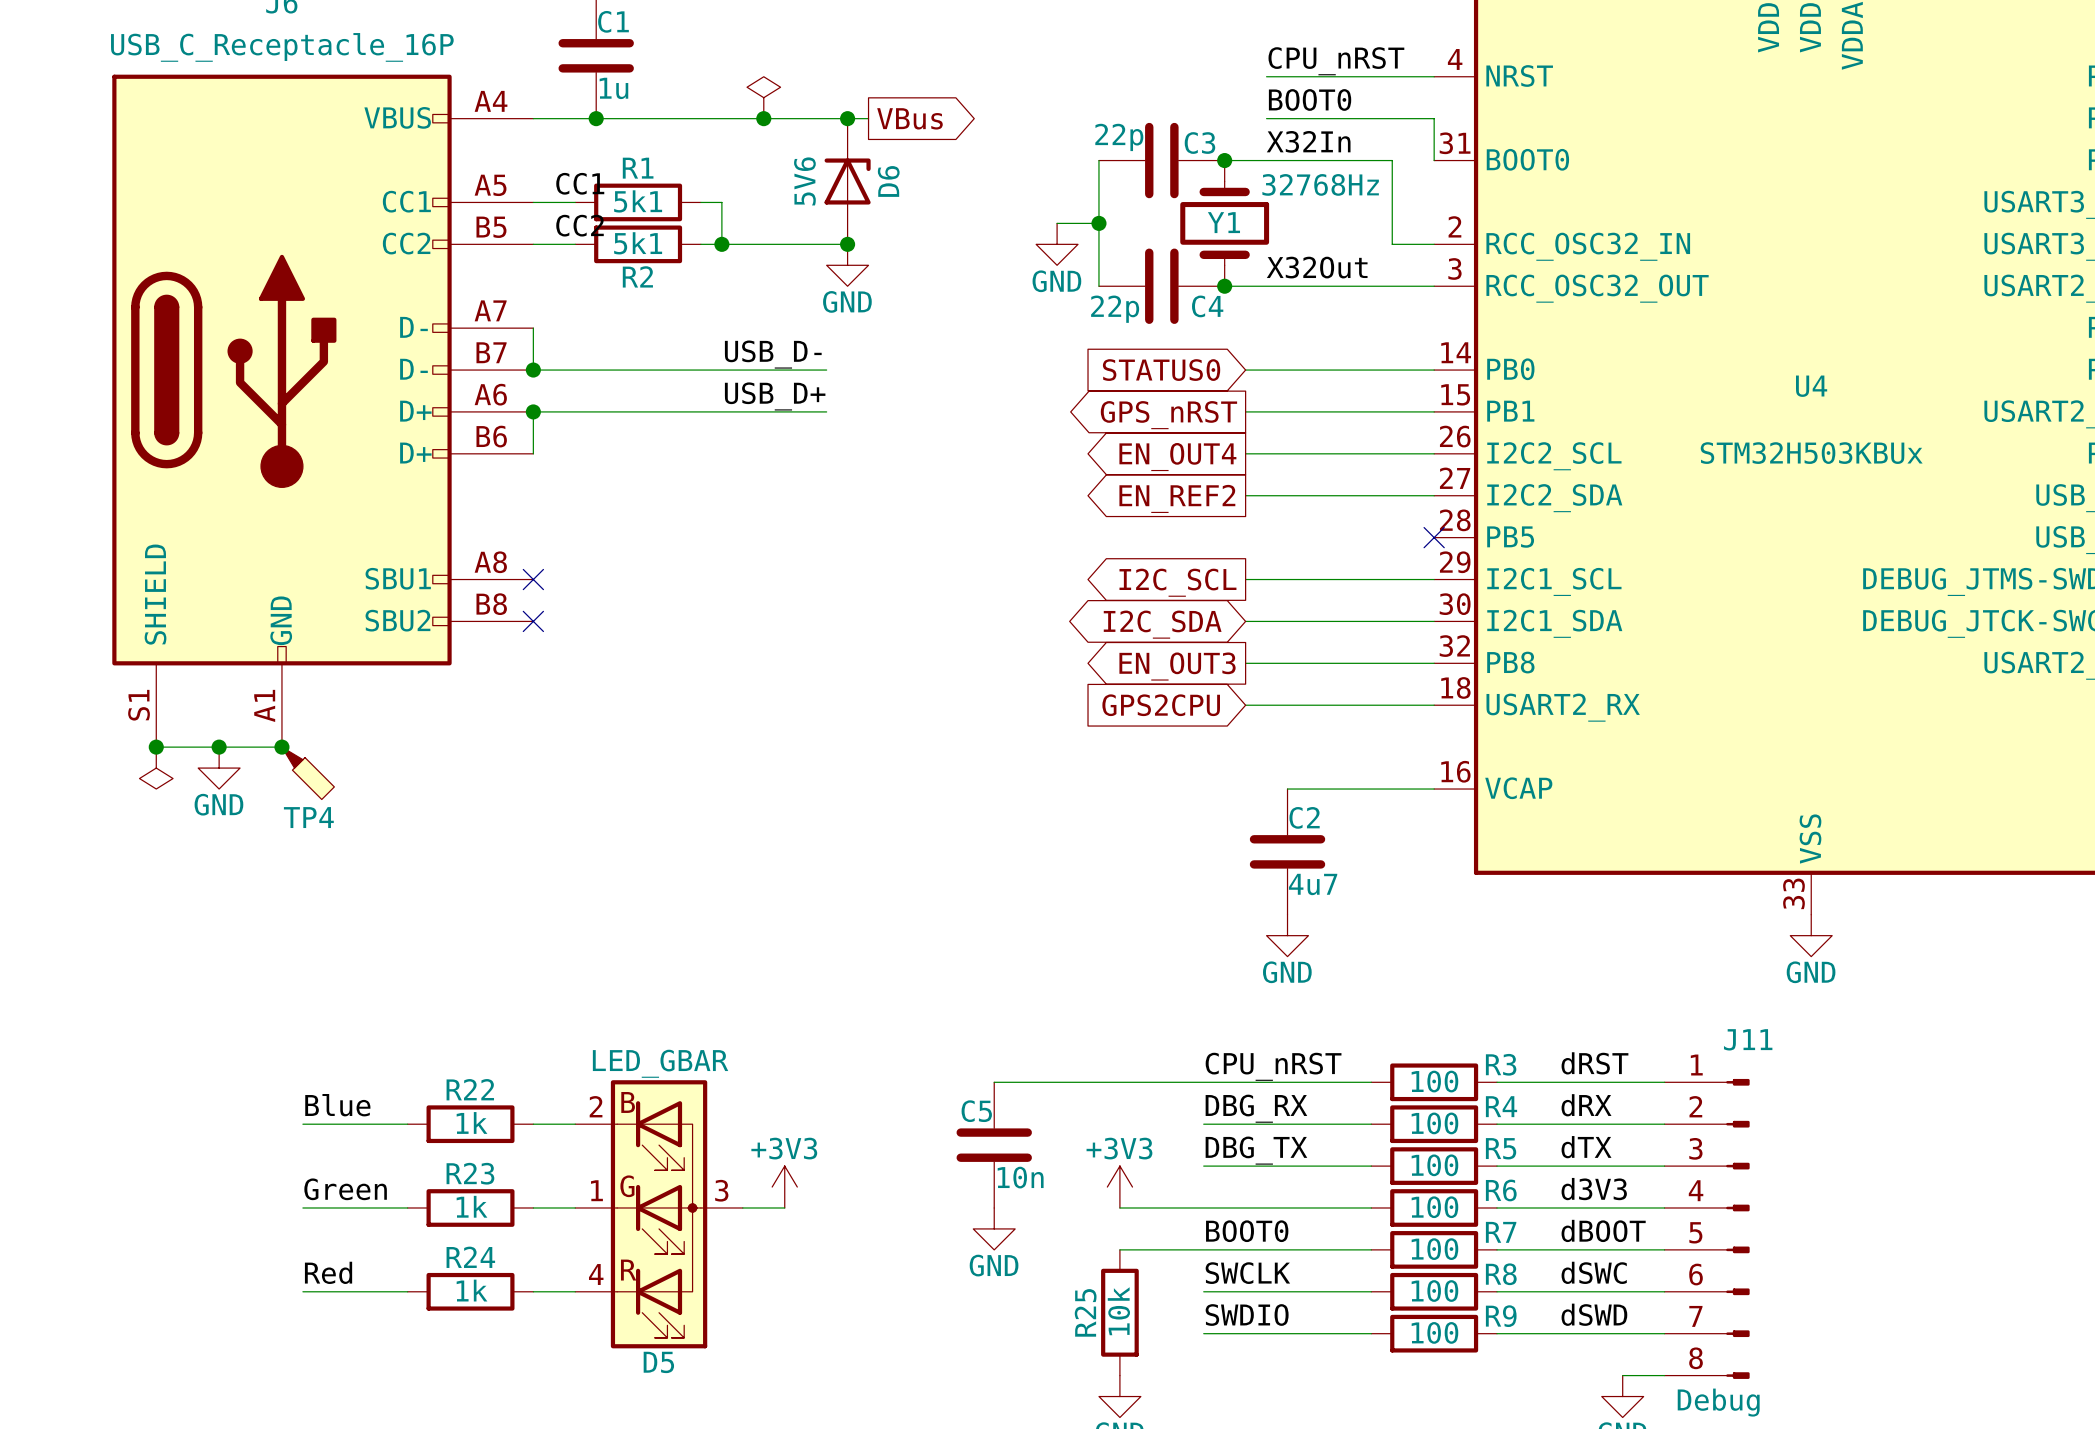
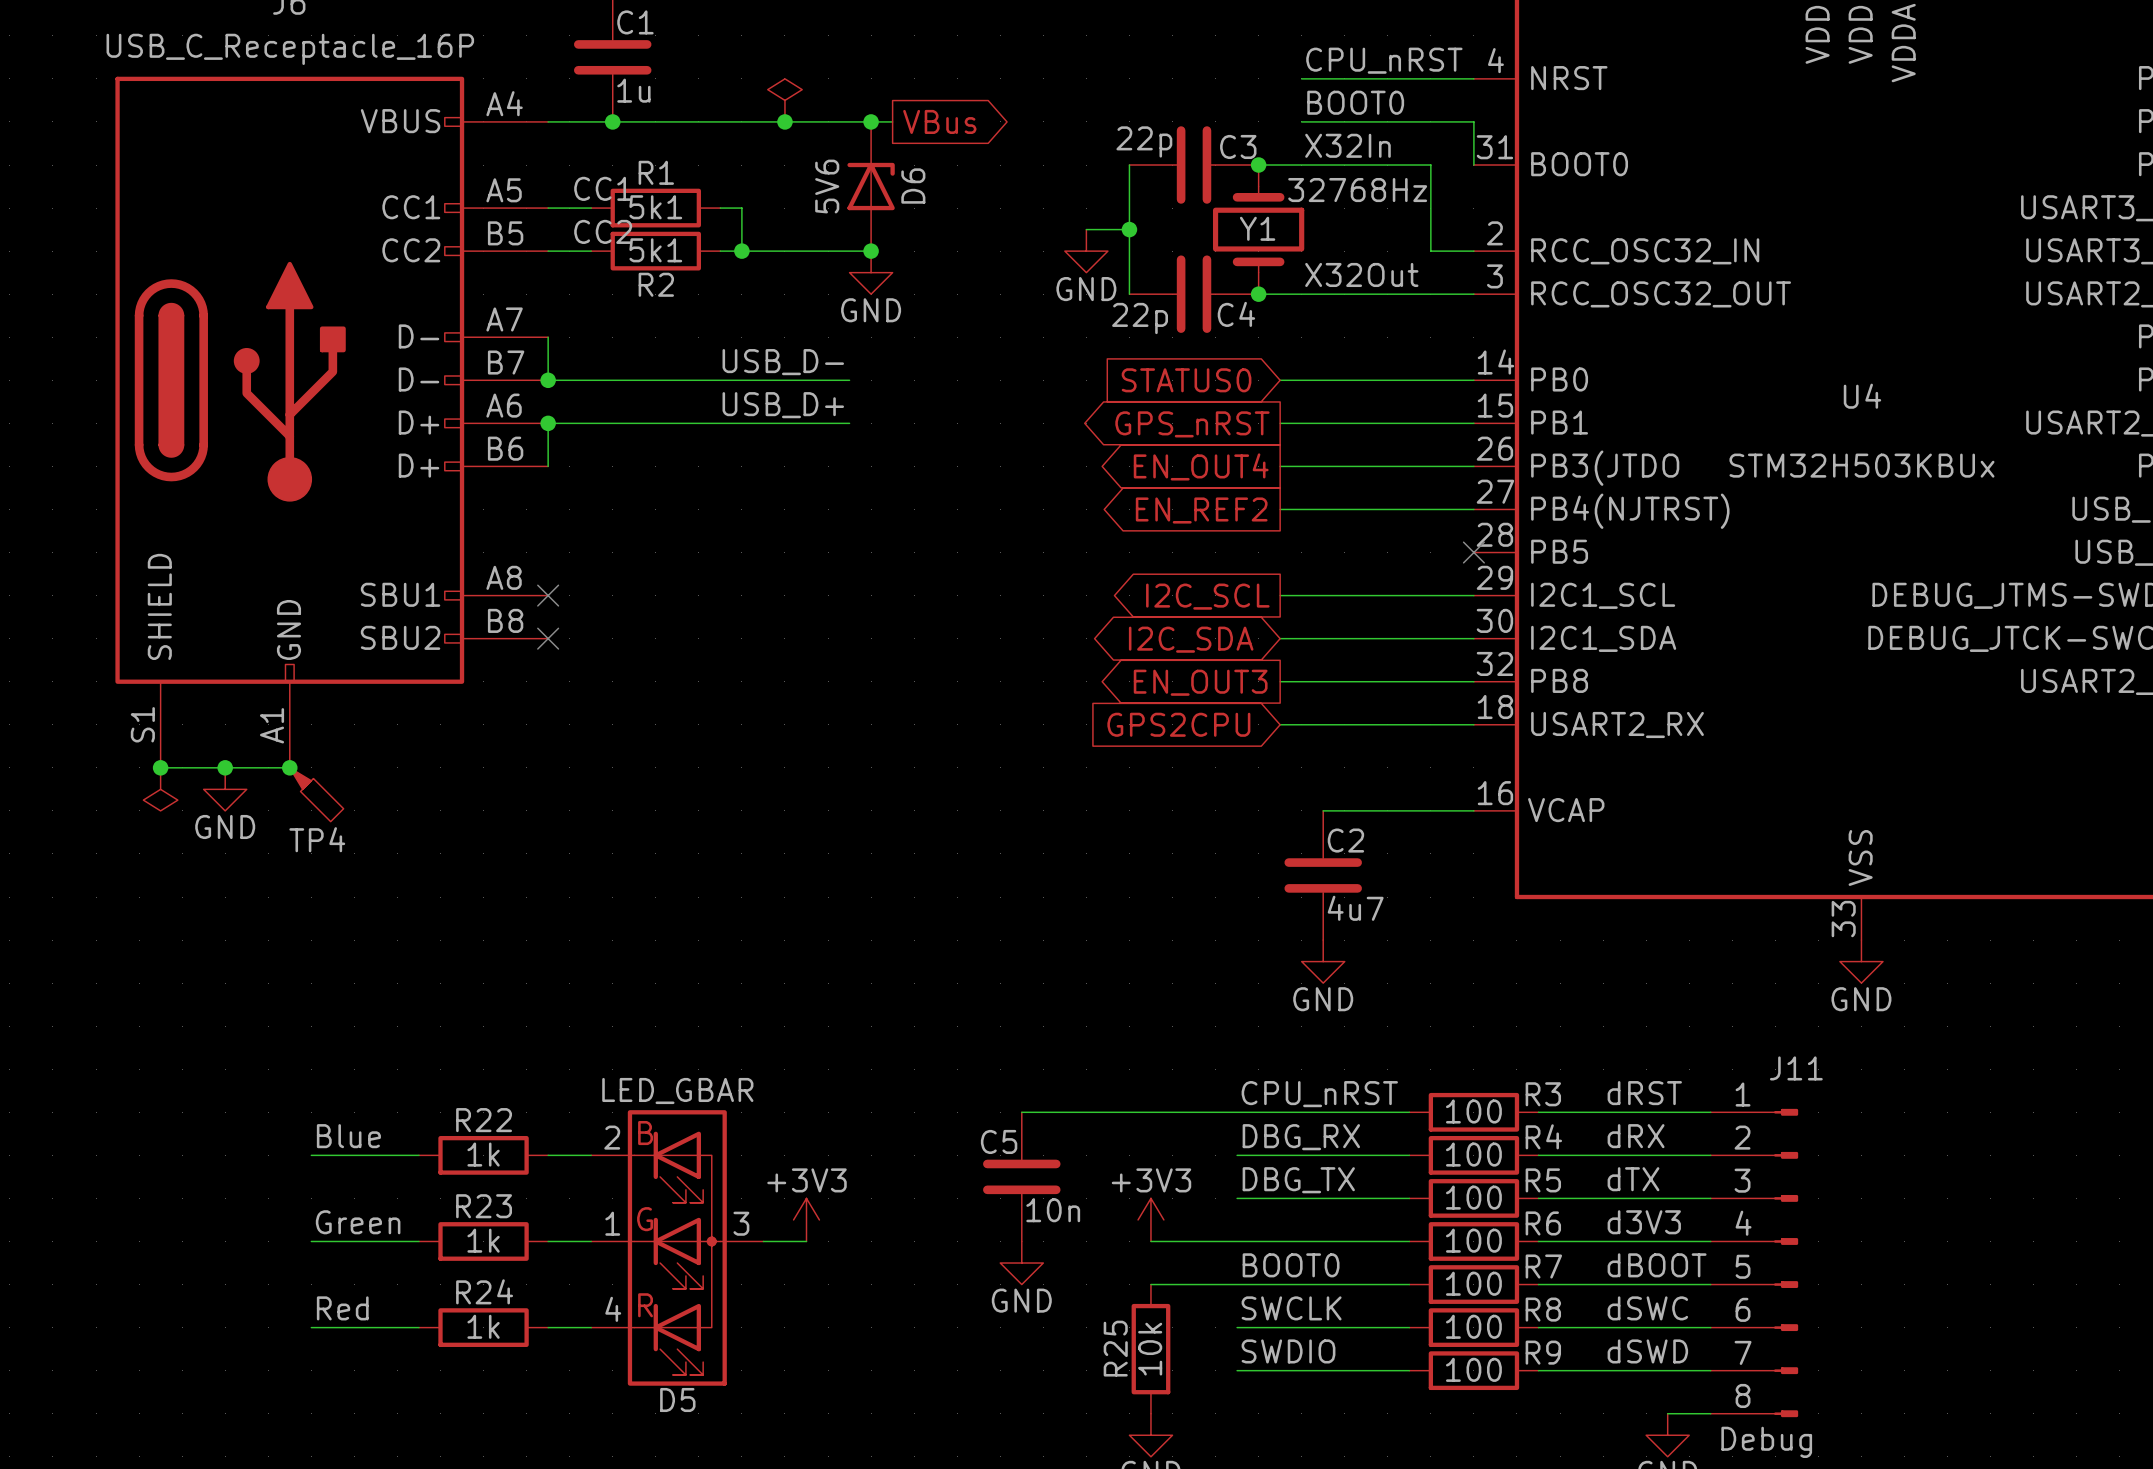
U4 pin name: I2C2_SCL (1554, 456) -> PB3(JTDO (1605, 468)
U4 pin name: I2C2_SDA (1554, 498) -> PB4(NJTRST) (1630, 511)

